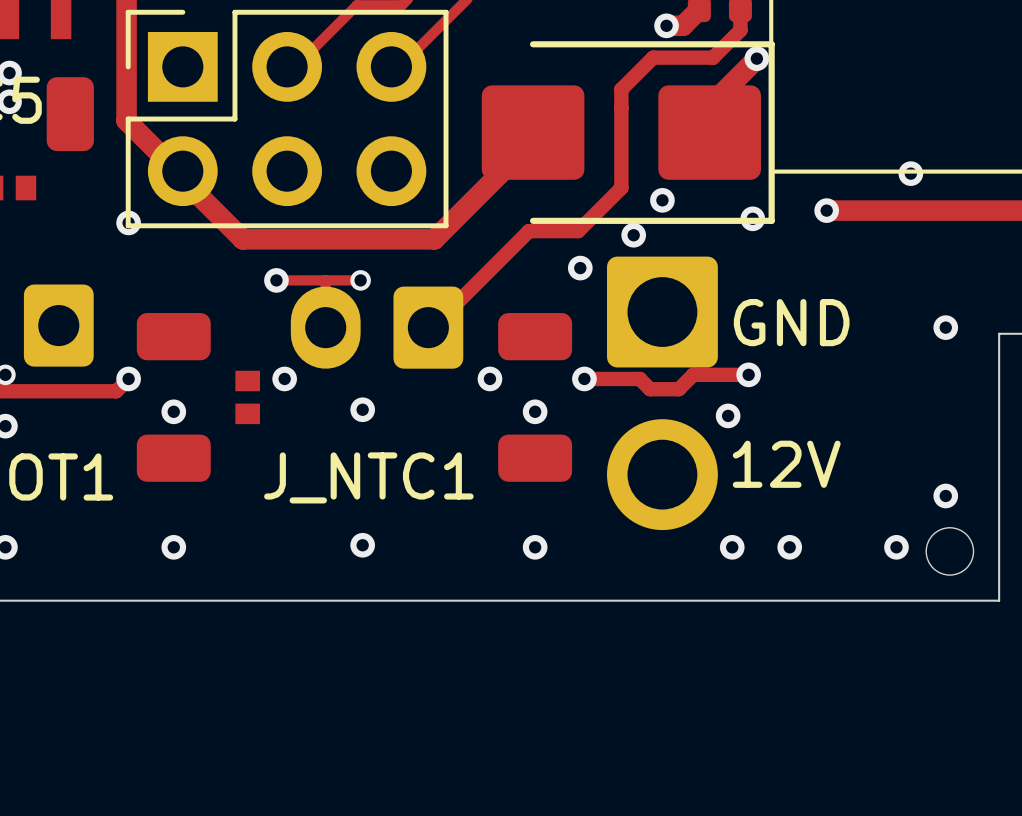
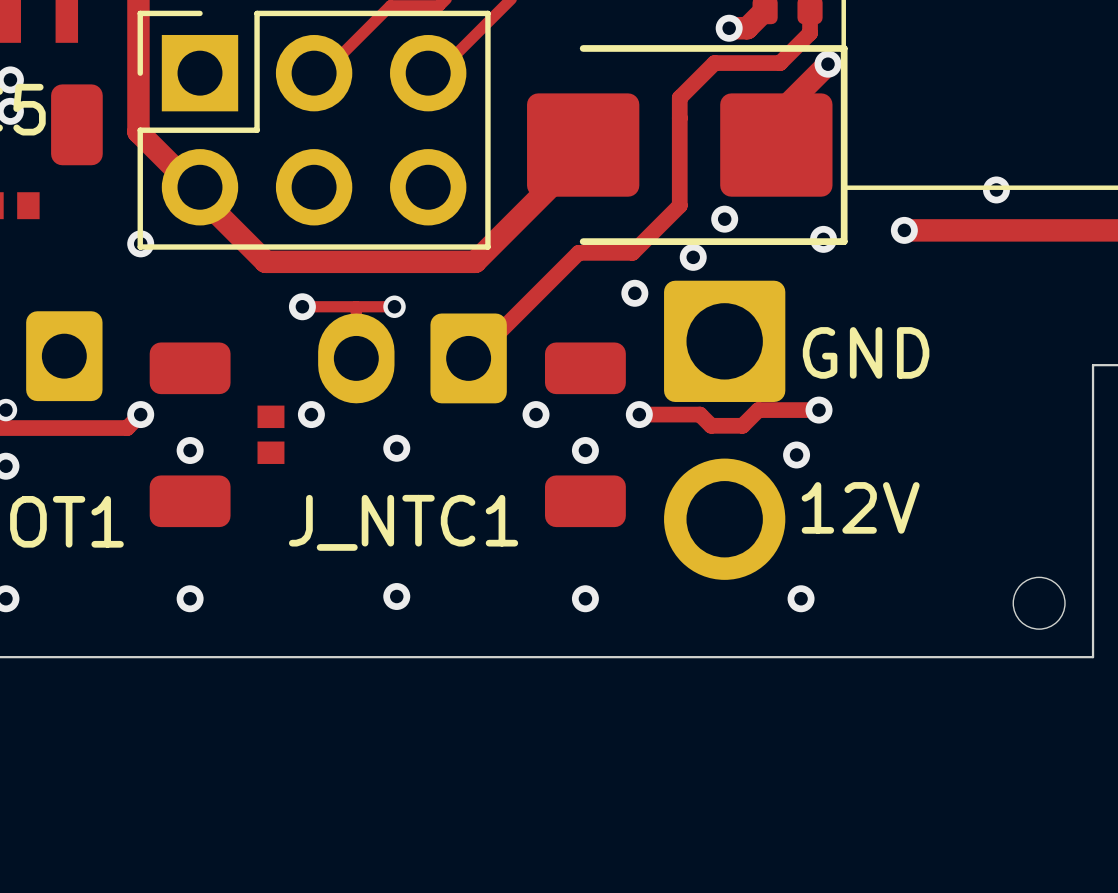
via: (945, 327) -> none
via: (945, 495) -> none
via: (789, 547) -> none
via: (896, 547) -> none

